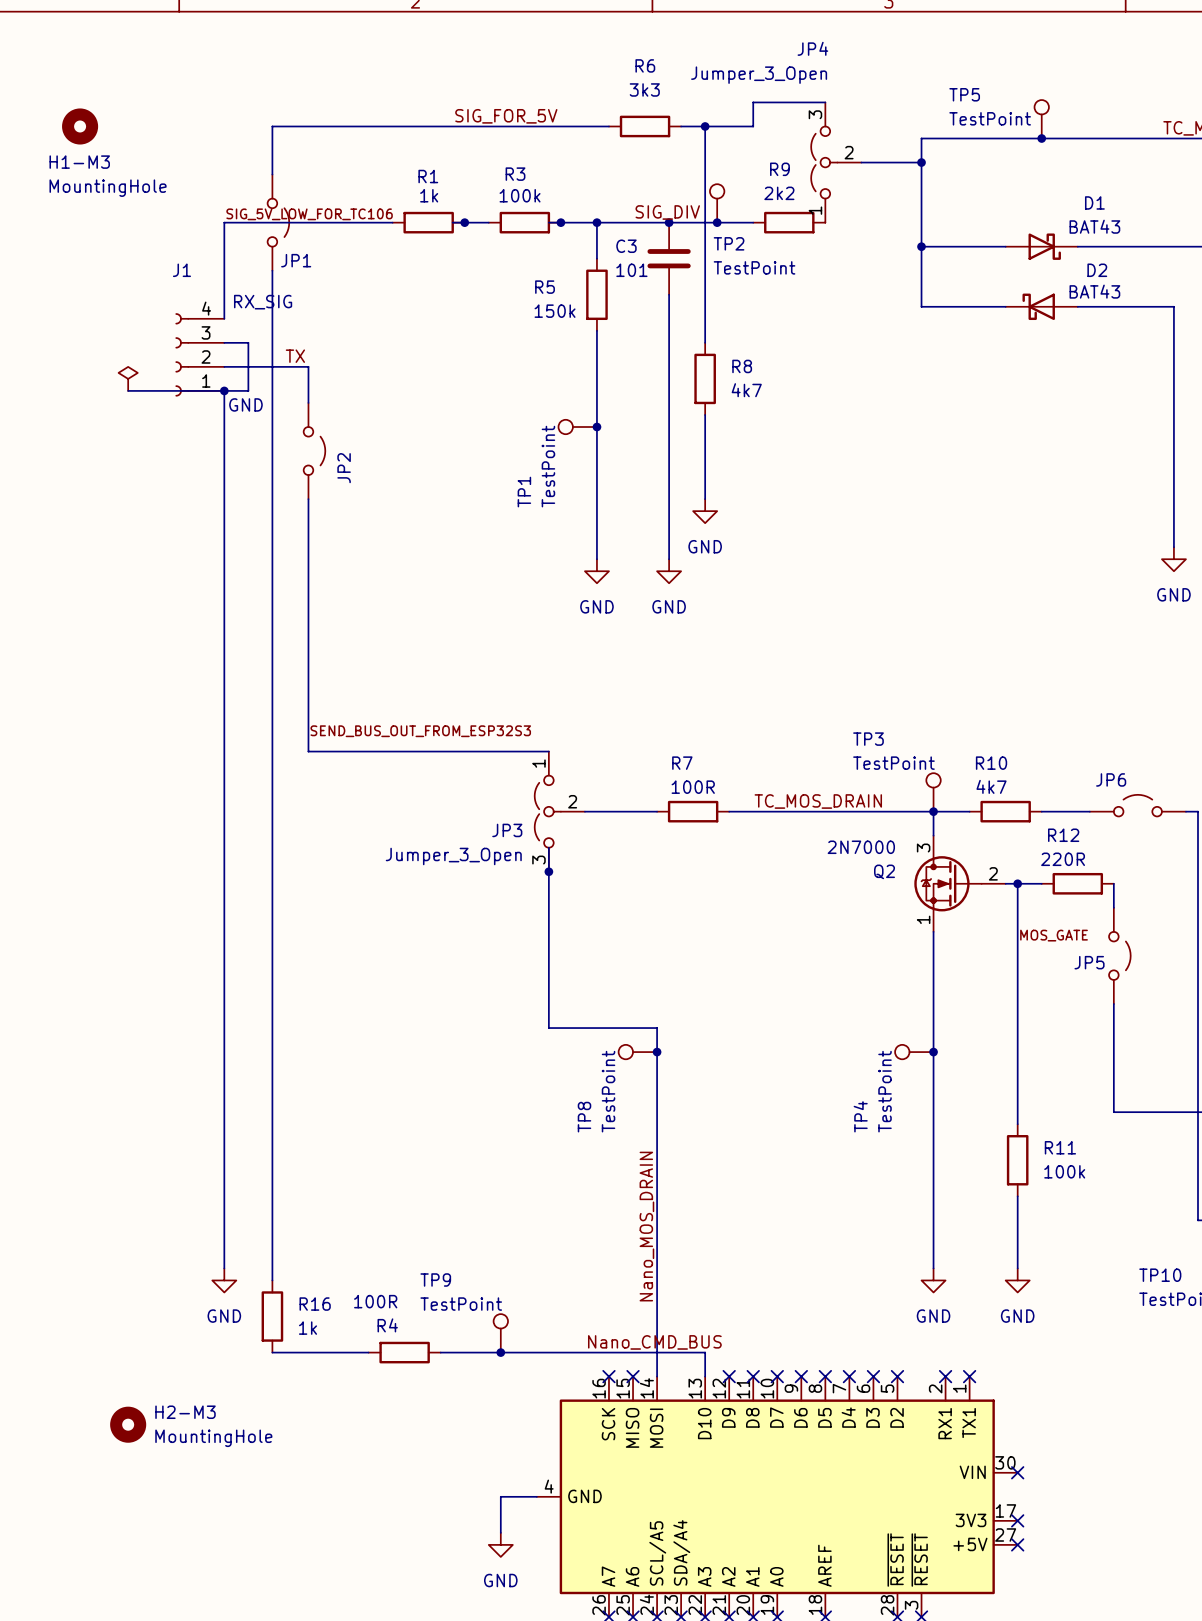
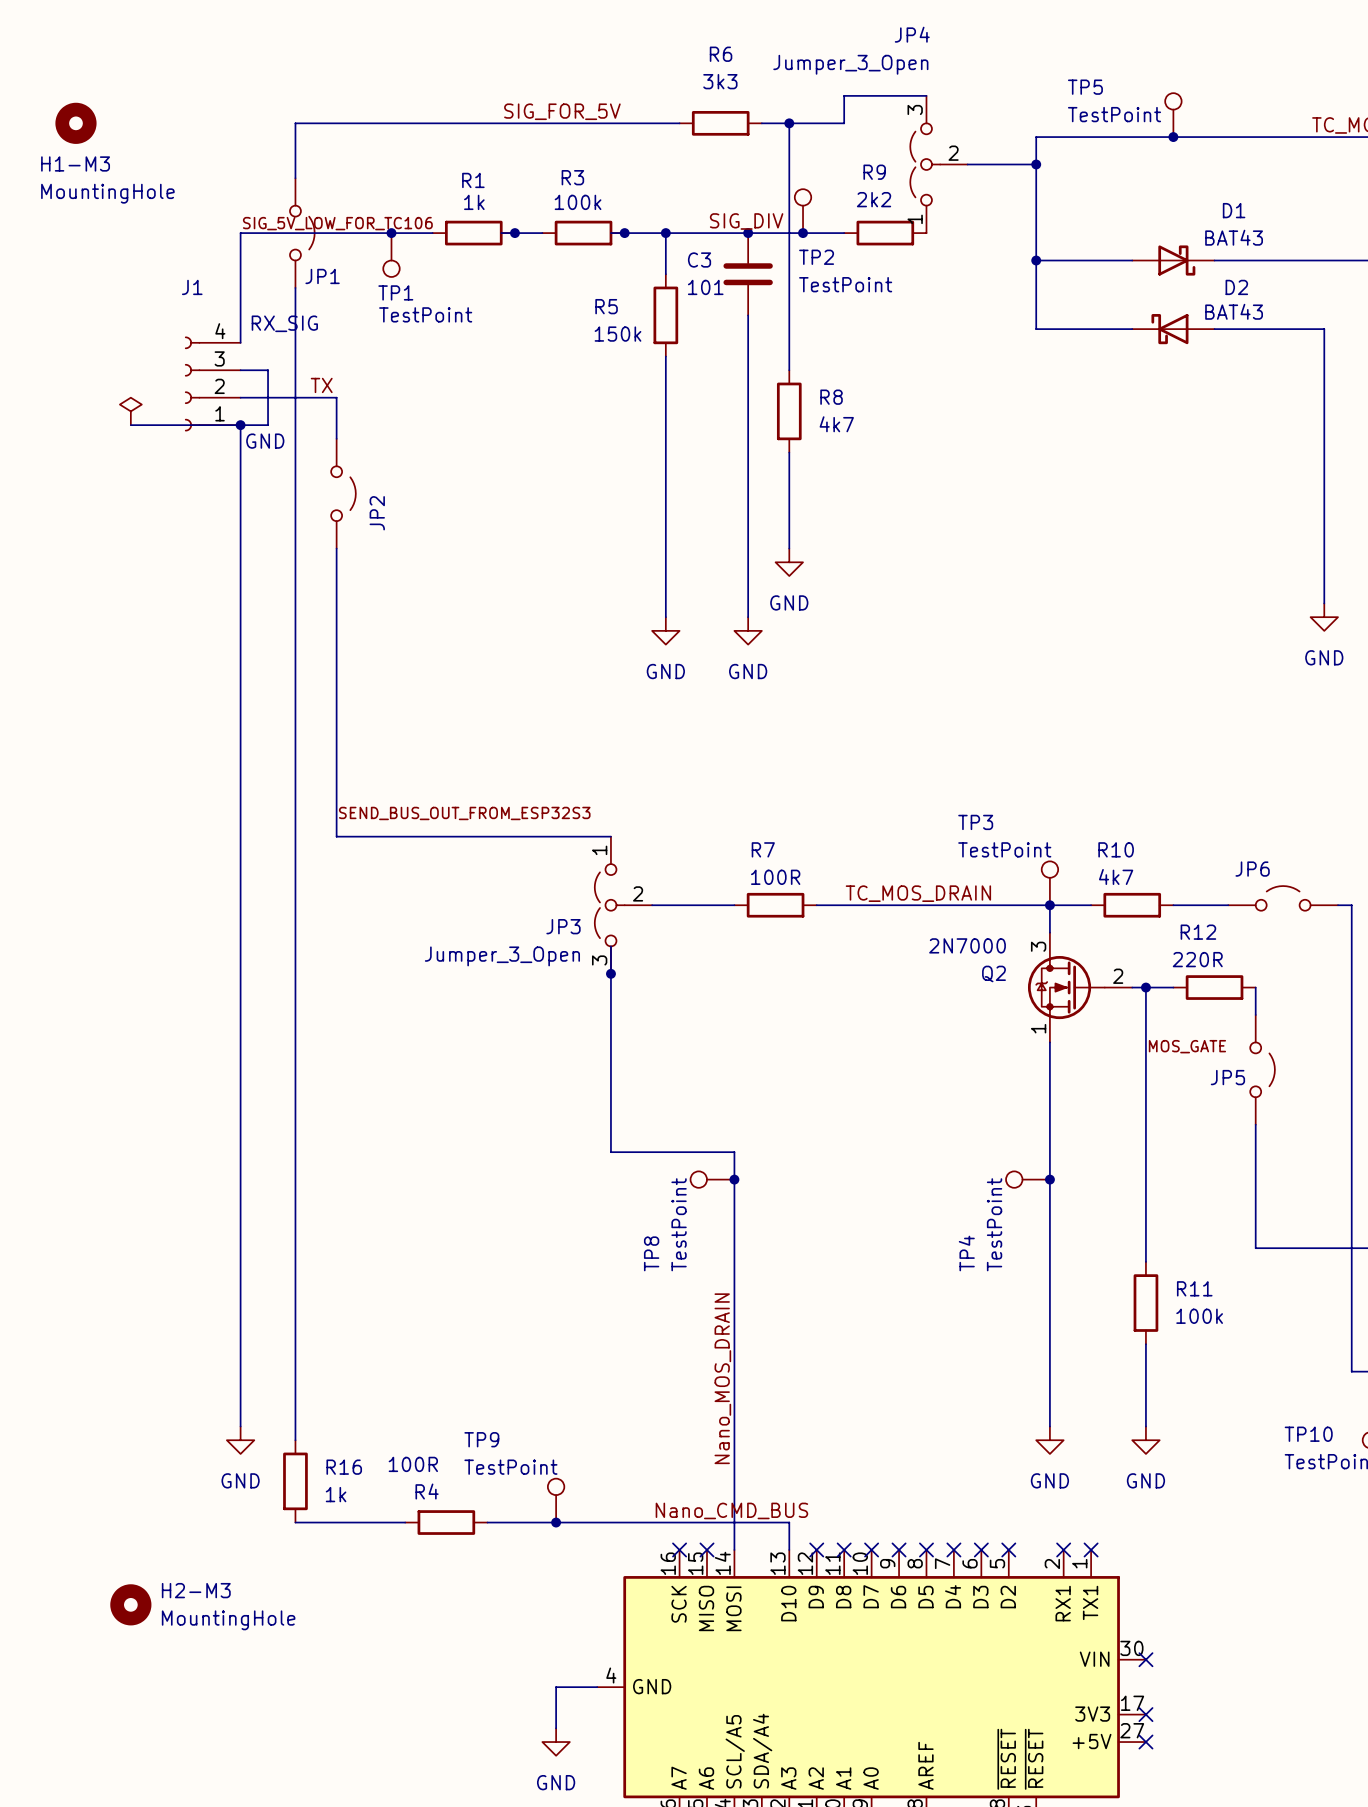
junction: none -> (391, 233)
TP1 rotation: 0° (565, 427) -> 90° counterclockwise (391, 268)
TP1 position: (577, 427) -> (391, 255)
junction: (596, 427) -> none
TP1 value position: TestPoint (548, 466) -> TestPoint (425, 314)
TP1 name position: TP1 (524, 492) -> TP1 (395, 292)

